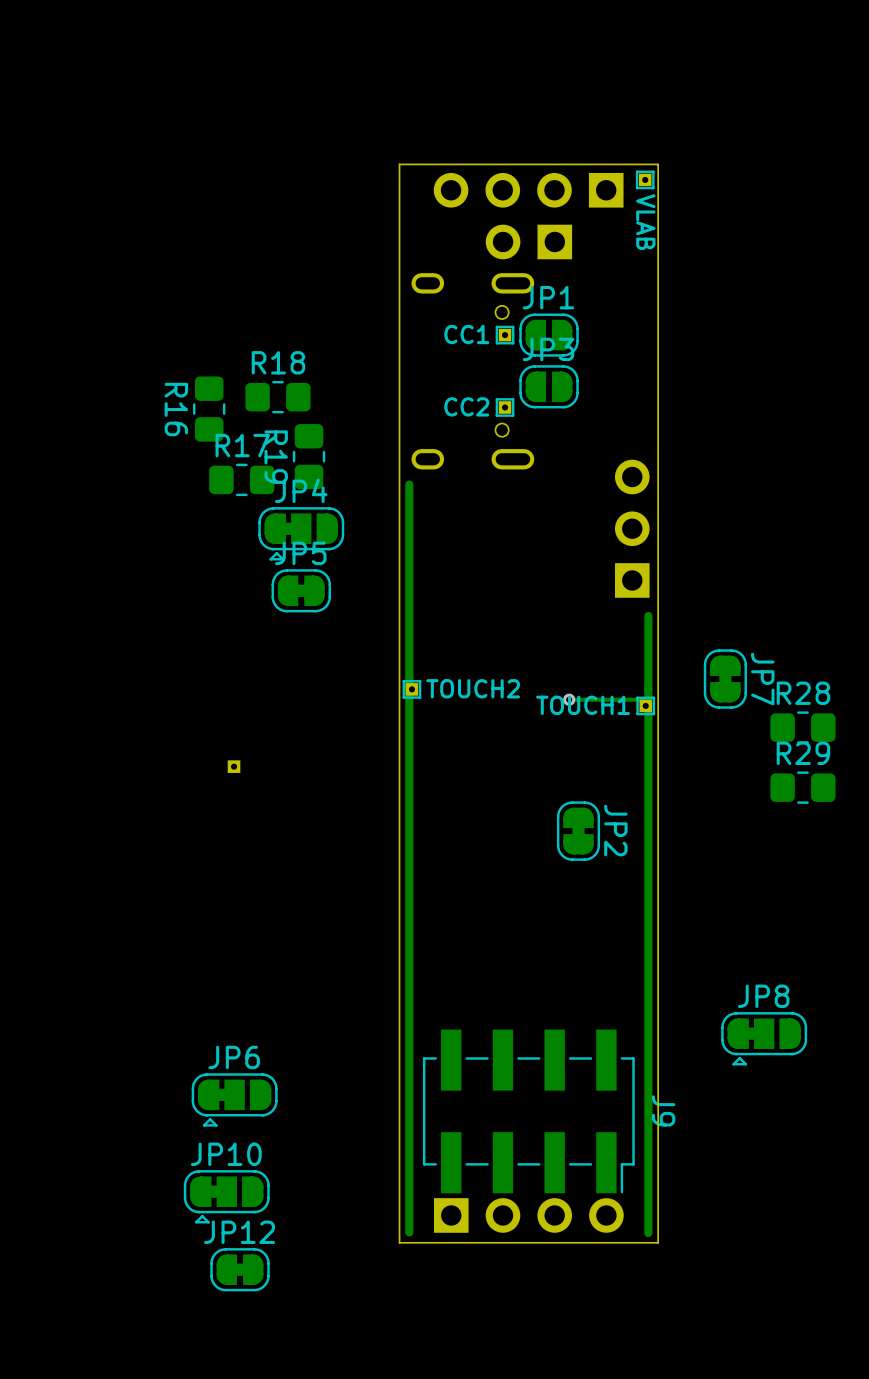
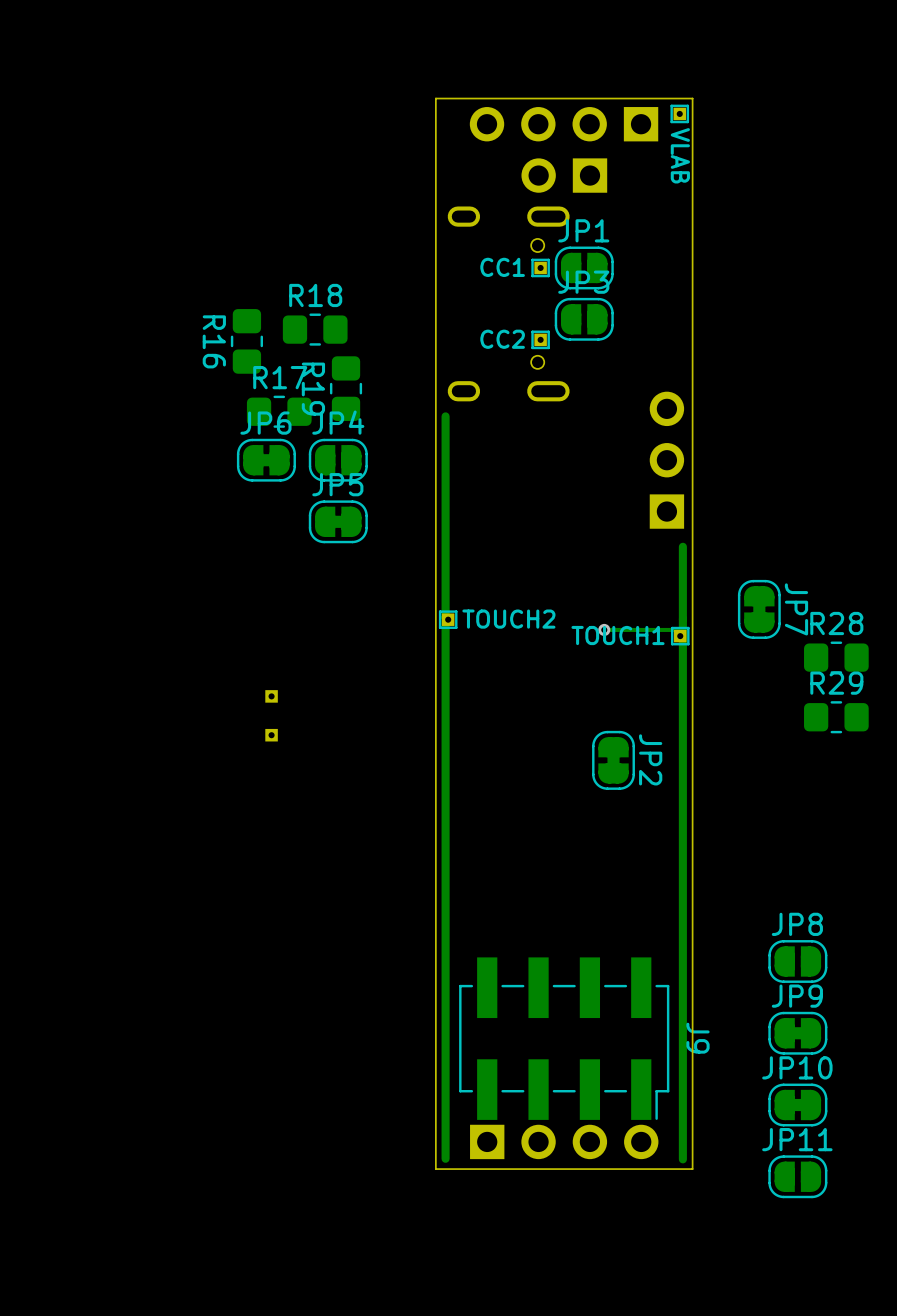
JP4 footprint: [258, 507, 345, 561] -> [308, 438, 368, 482]
part: none -> (271, 735)
JP8 footprint: [721, 1012, 808, 1066] -> [768, 940, 828, 983]
JP6 footprint: [191, 1073, 278, 1127] -> [236, 438, 296, 482]
JP9: none -> (797, 1033)
JP10 footprint: [183, 1170, 270, 1224] -> [768, 1083, 828, 1127]
JP11: none -> (797, 1176)
JP12: (240, 1269) -> none

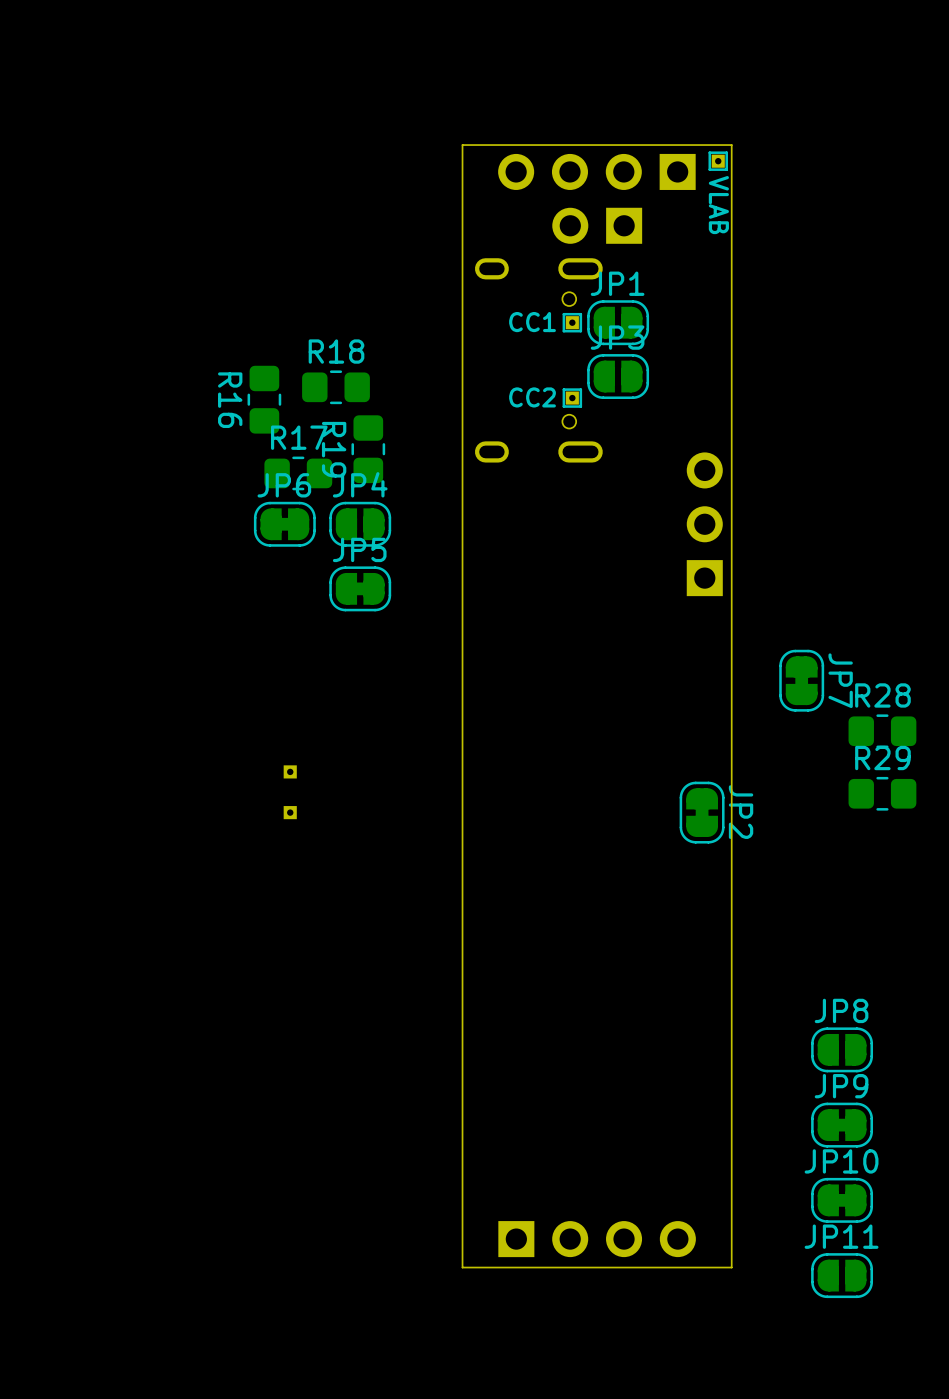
track: (445, 416) (445, 1158) -> none
track: (682, 546) (682, 1159) -> none
part: TOUCH2 (448, 619) -> none
via: (604, 629) -> none
track: (684, 629) (604, 629) -> none
part: TOUCH1 (680, 636) -> none
JP2 position: (613, 760) -> (702, 812)
J9: (564, 1038) -> none

